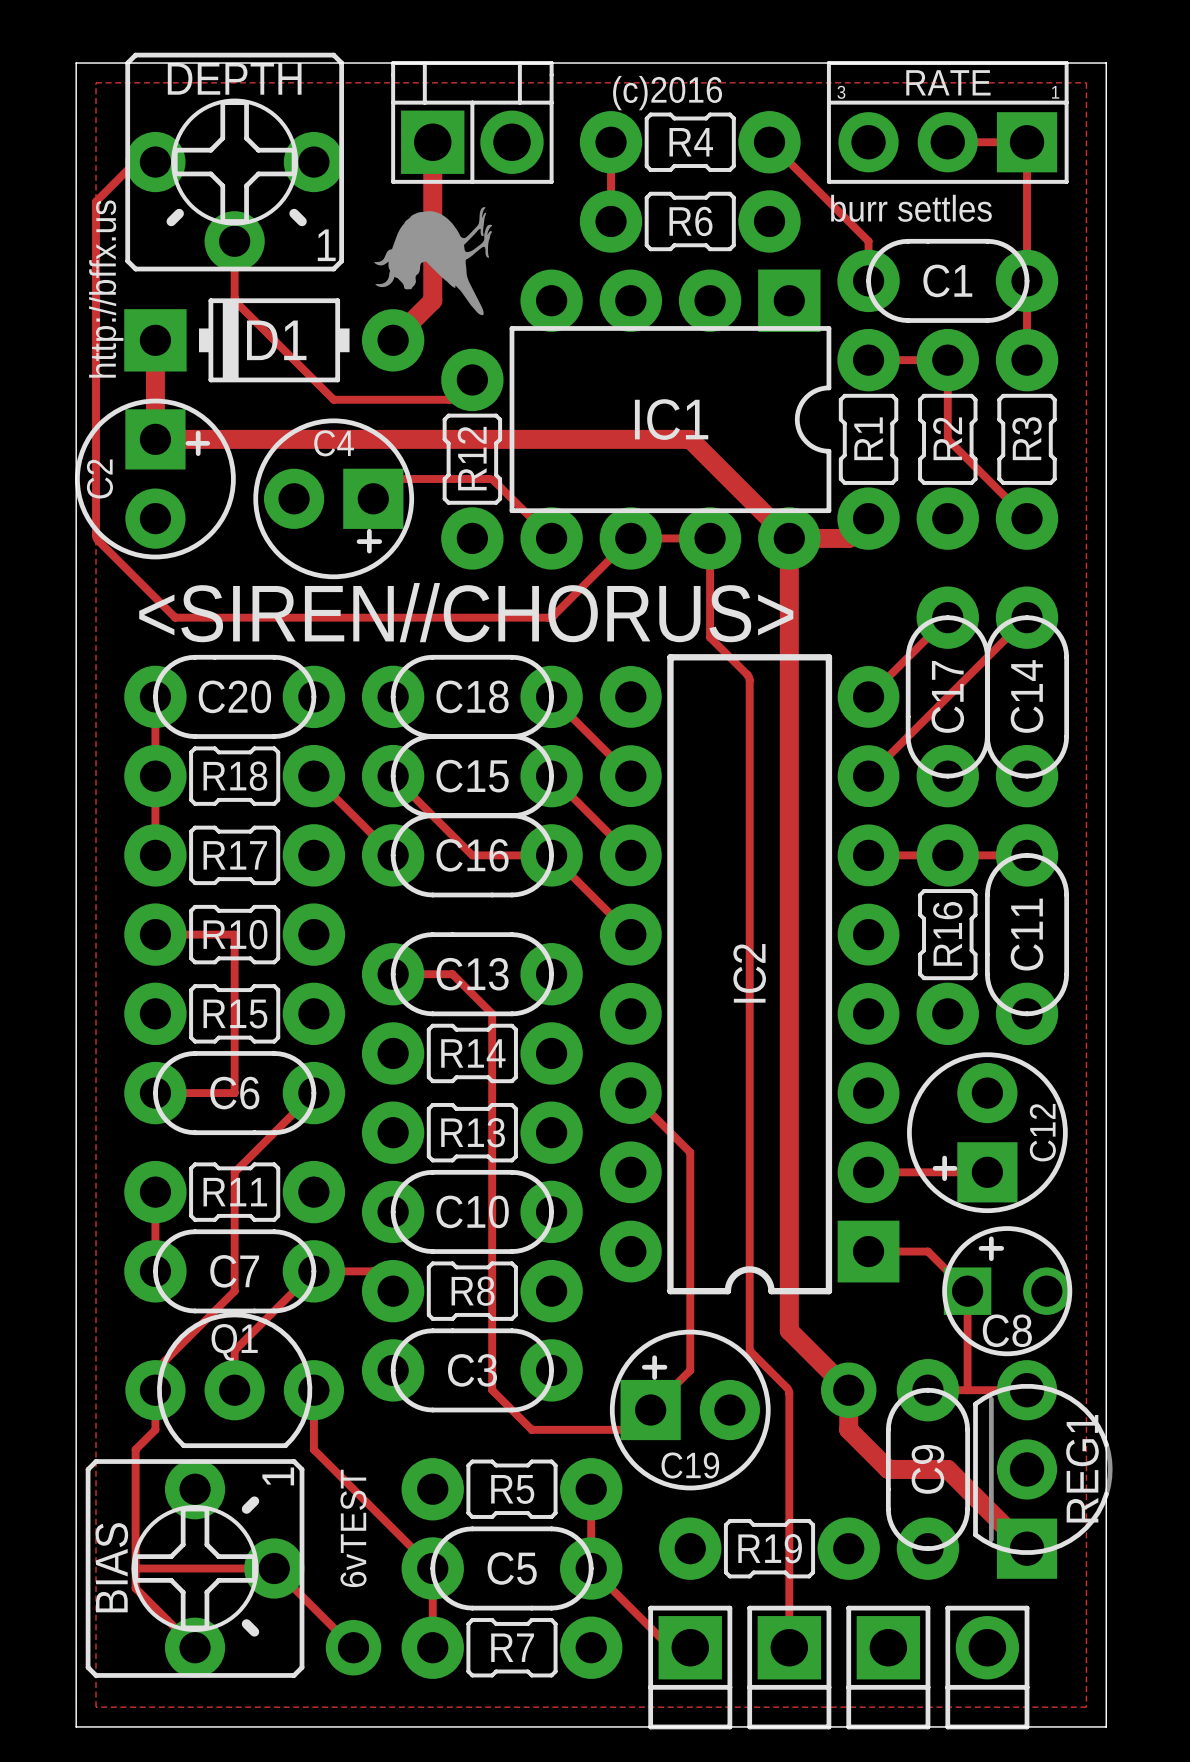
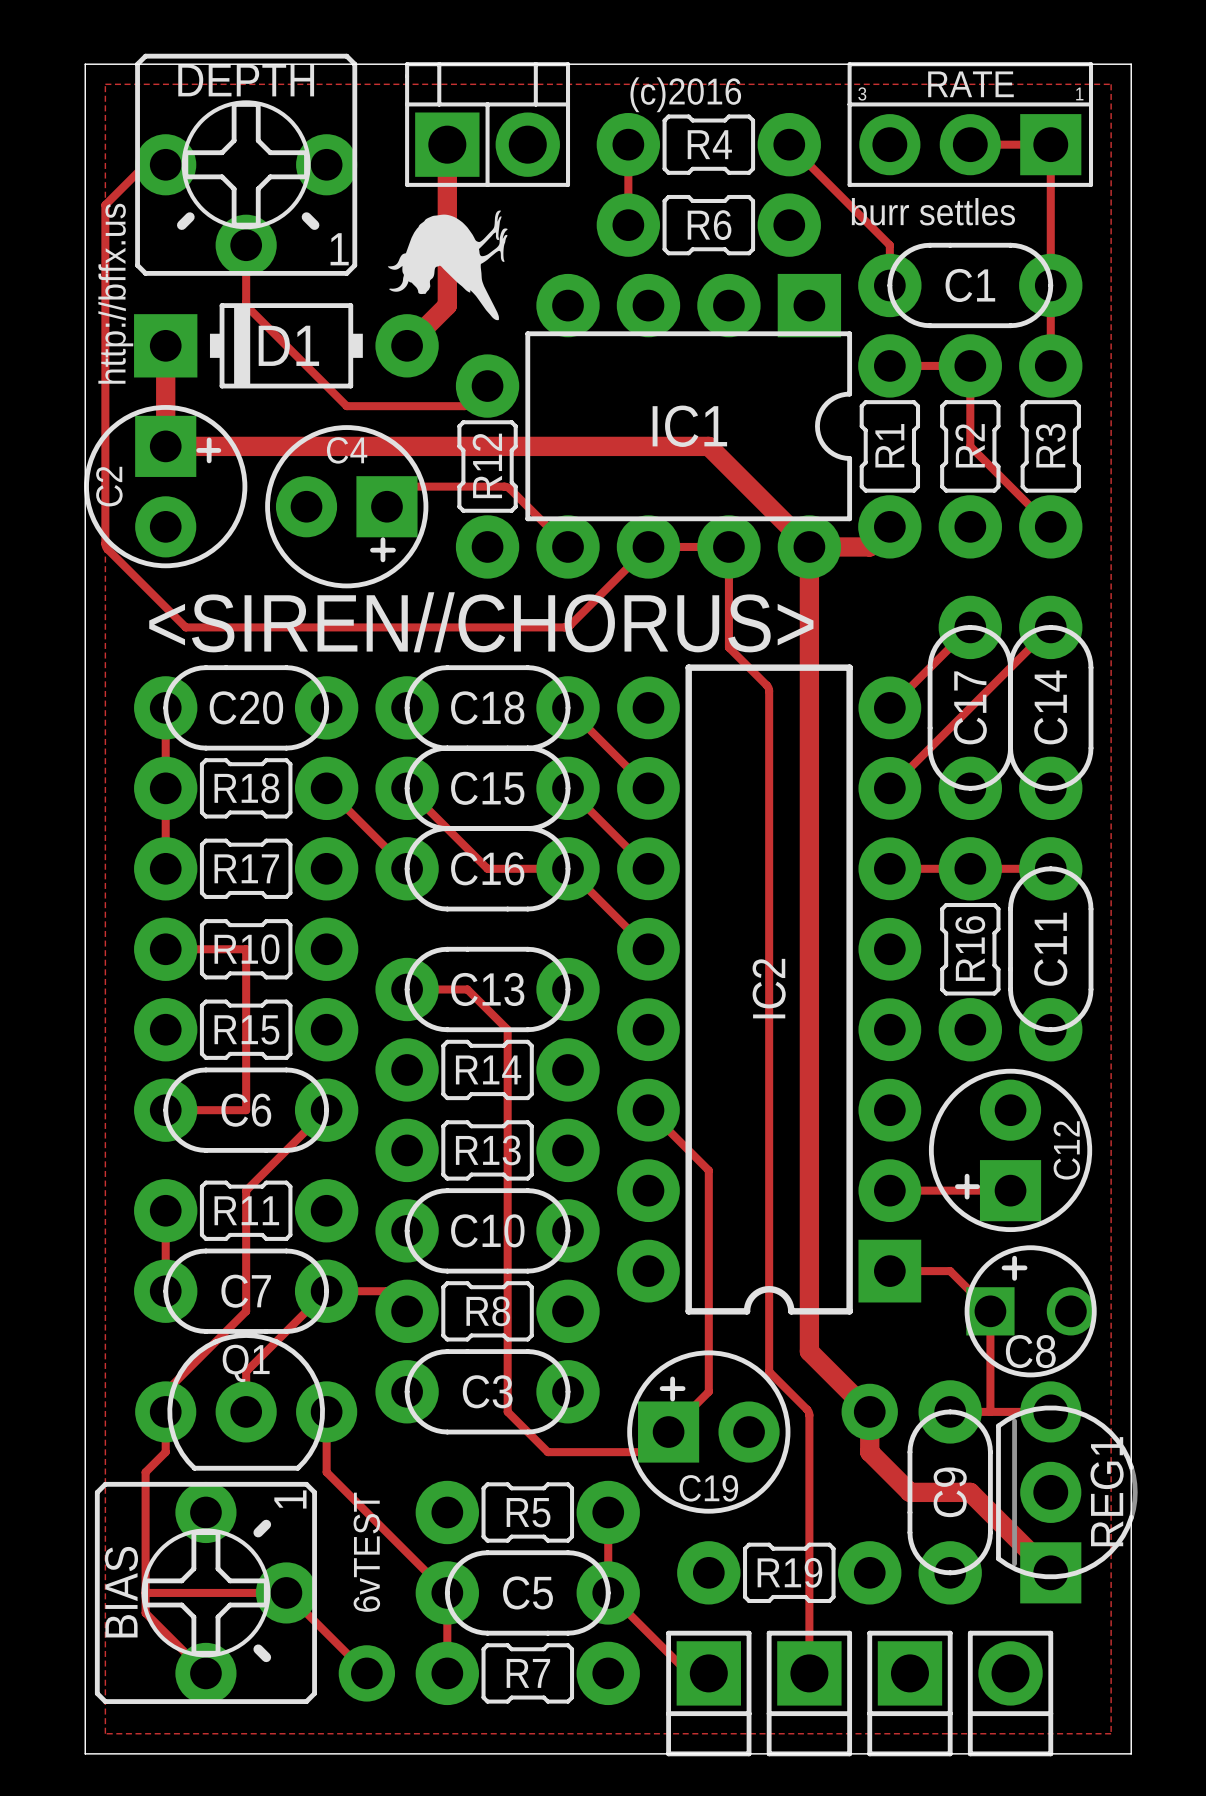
drawing shape: [373, 207, 493, 316] -> [386, 210, 508, 321]

